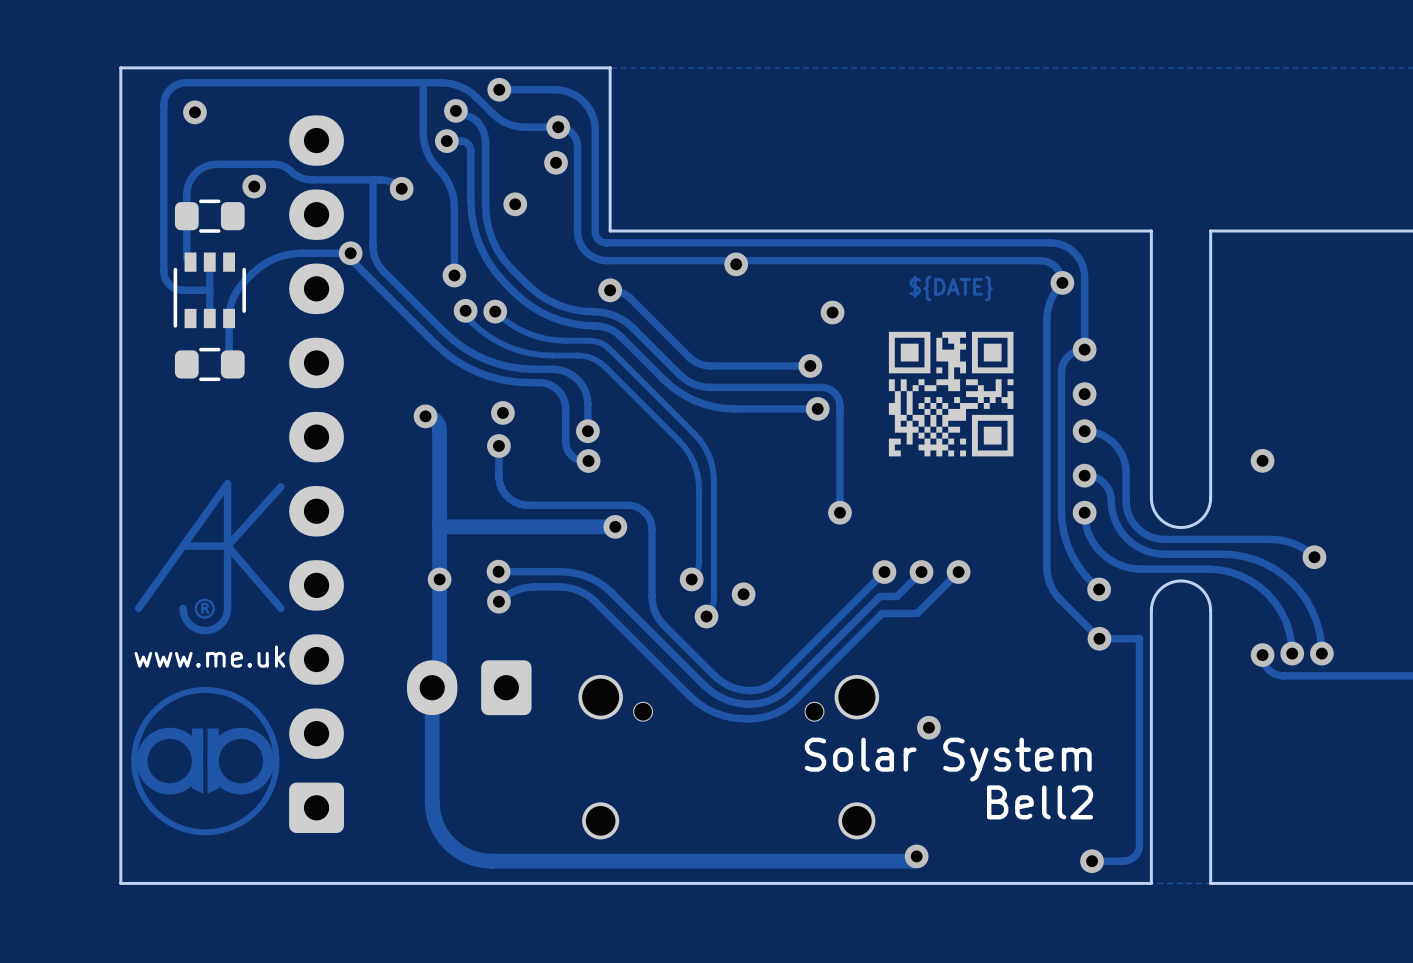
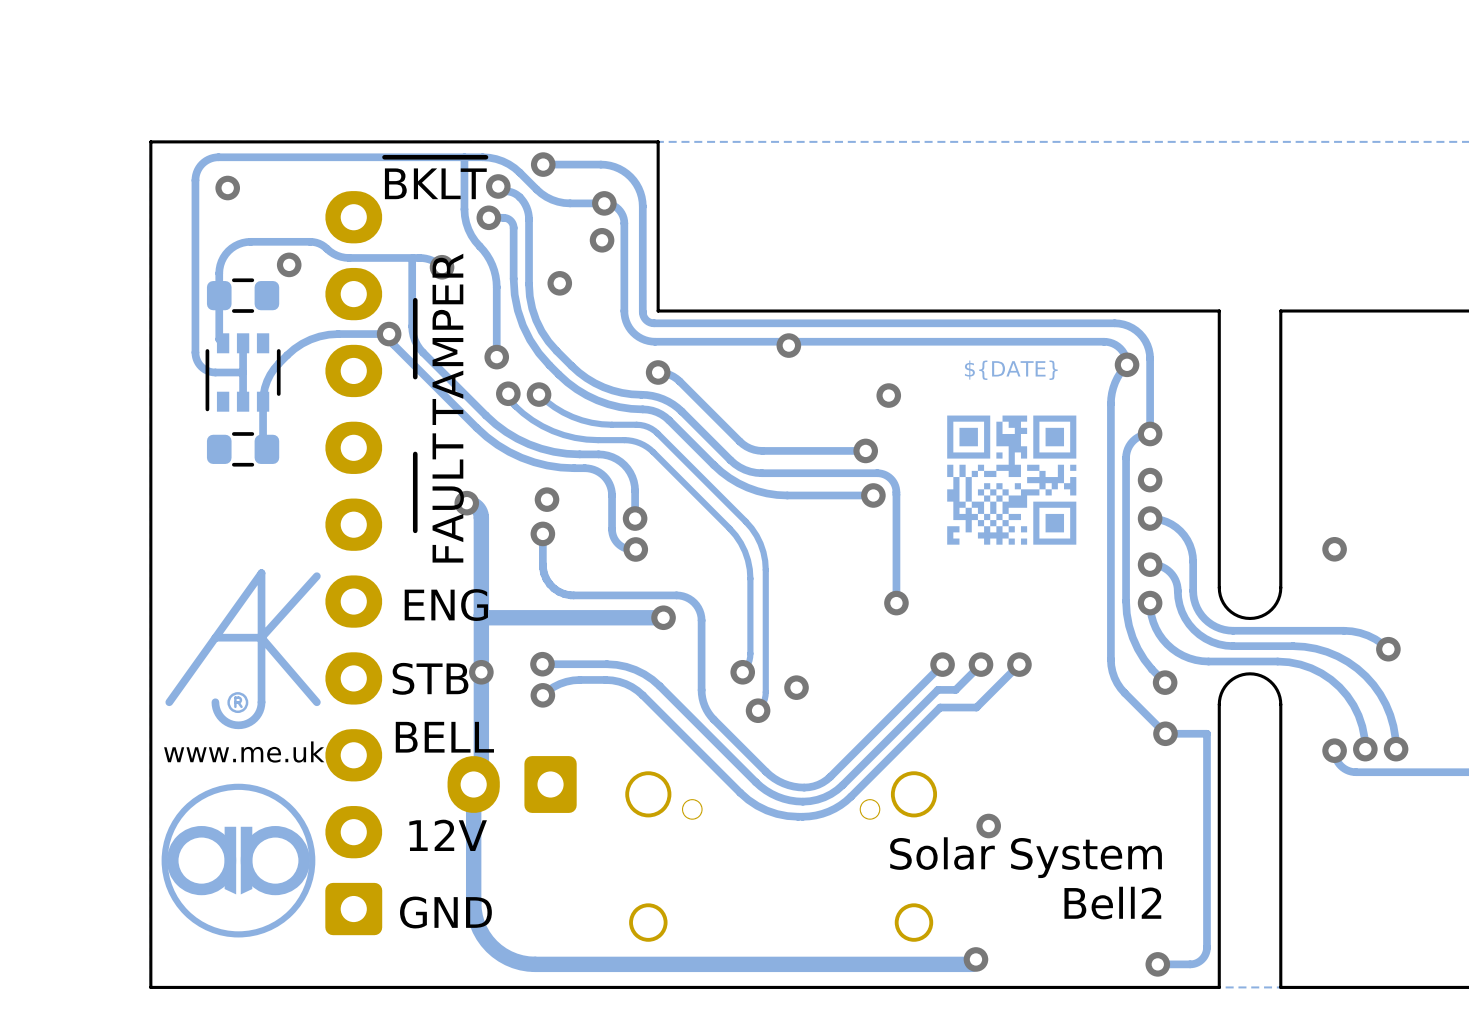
line: none -> (485, 157) (384, 157)
text: none -> BKLT (435, 183)
line: none -> (415, 300) (415, 377)
text: none -> TAMPER (447, 339)
line: none -> (415, 453) (415, 530)
text: none -> FAULT (448, 497)
text: none -> ENG (446, 605)
text: none -> STB (430, 678)
text: none -> BELL (444, 737)
text: none -> 12V (448, 835)
text: none -> GND (445, 912)

